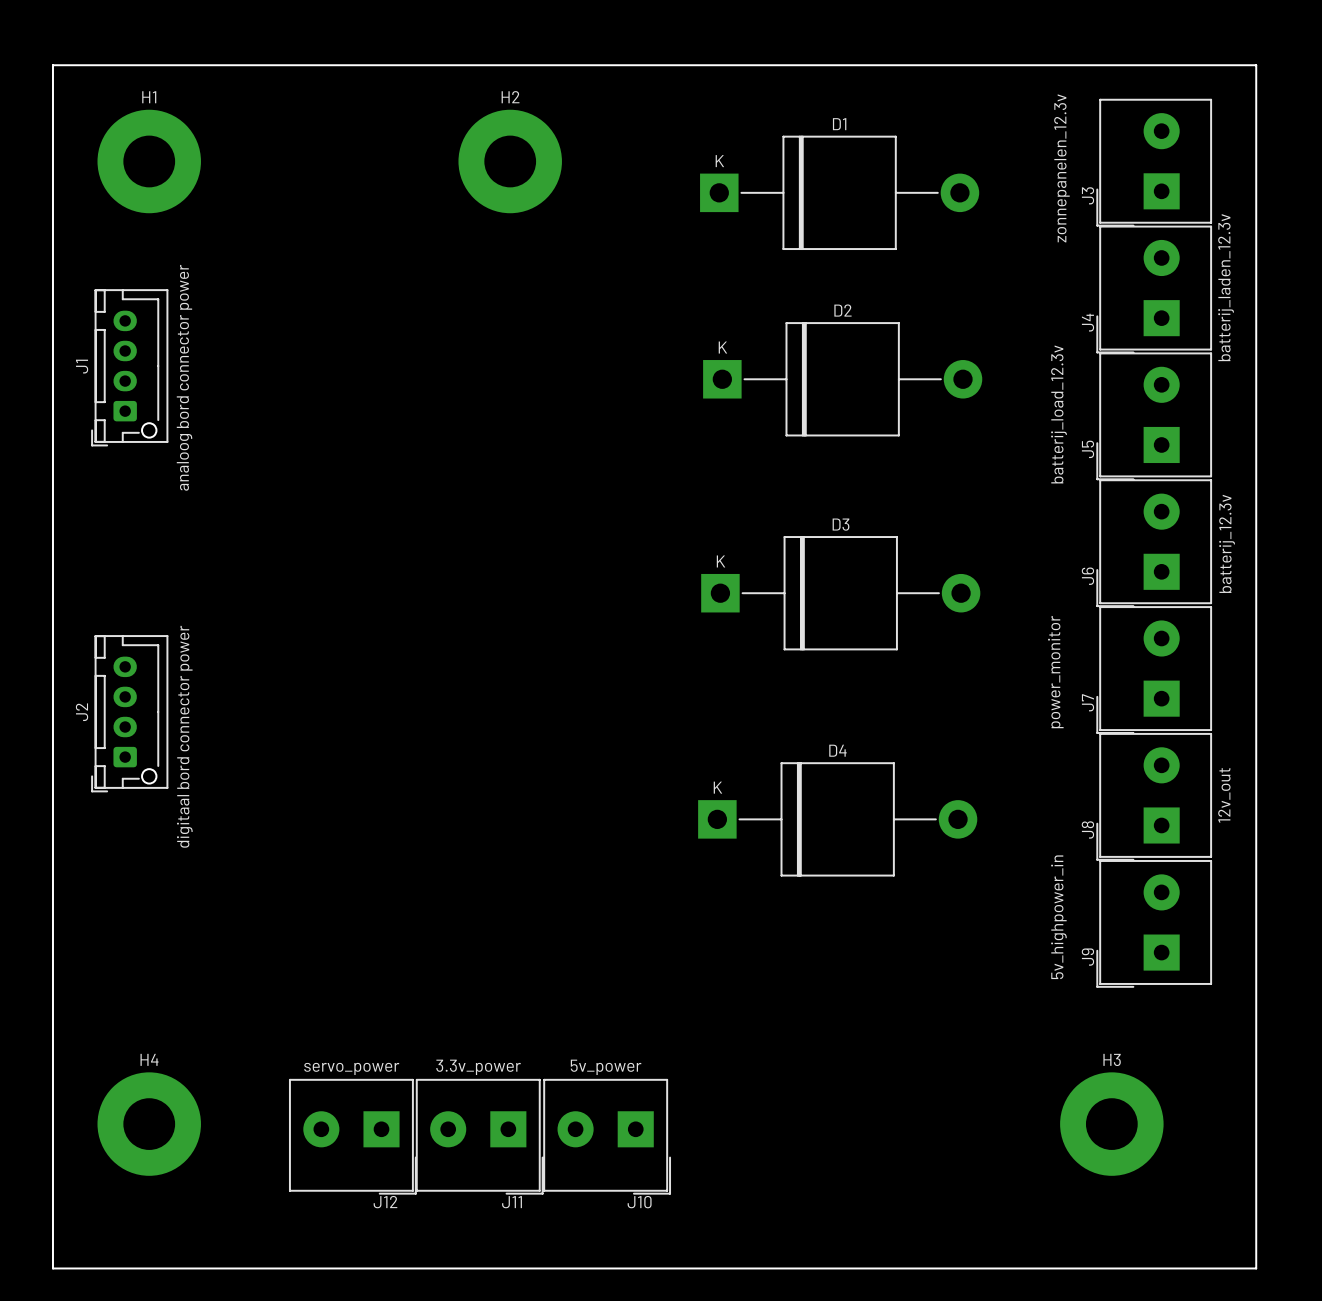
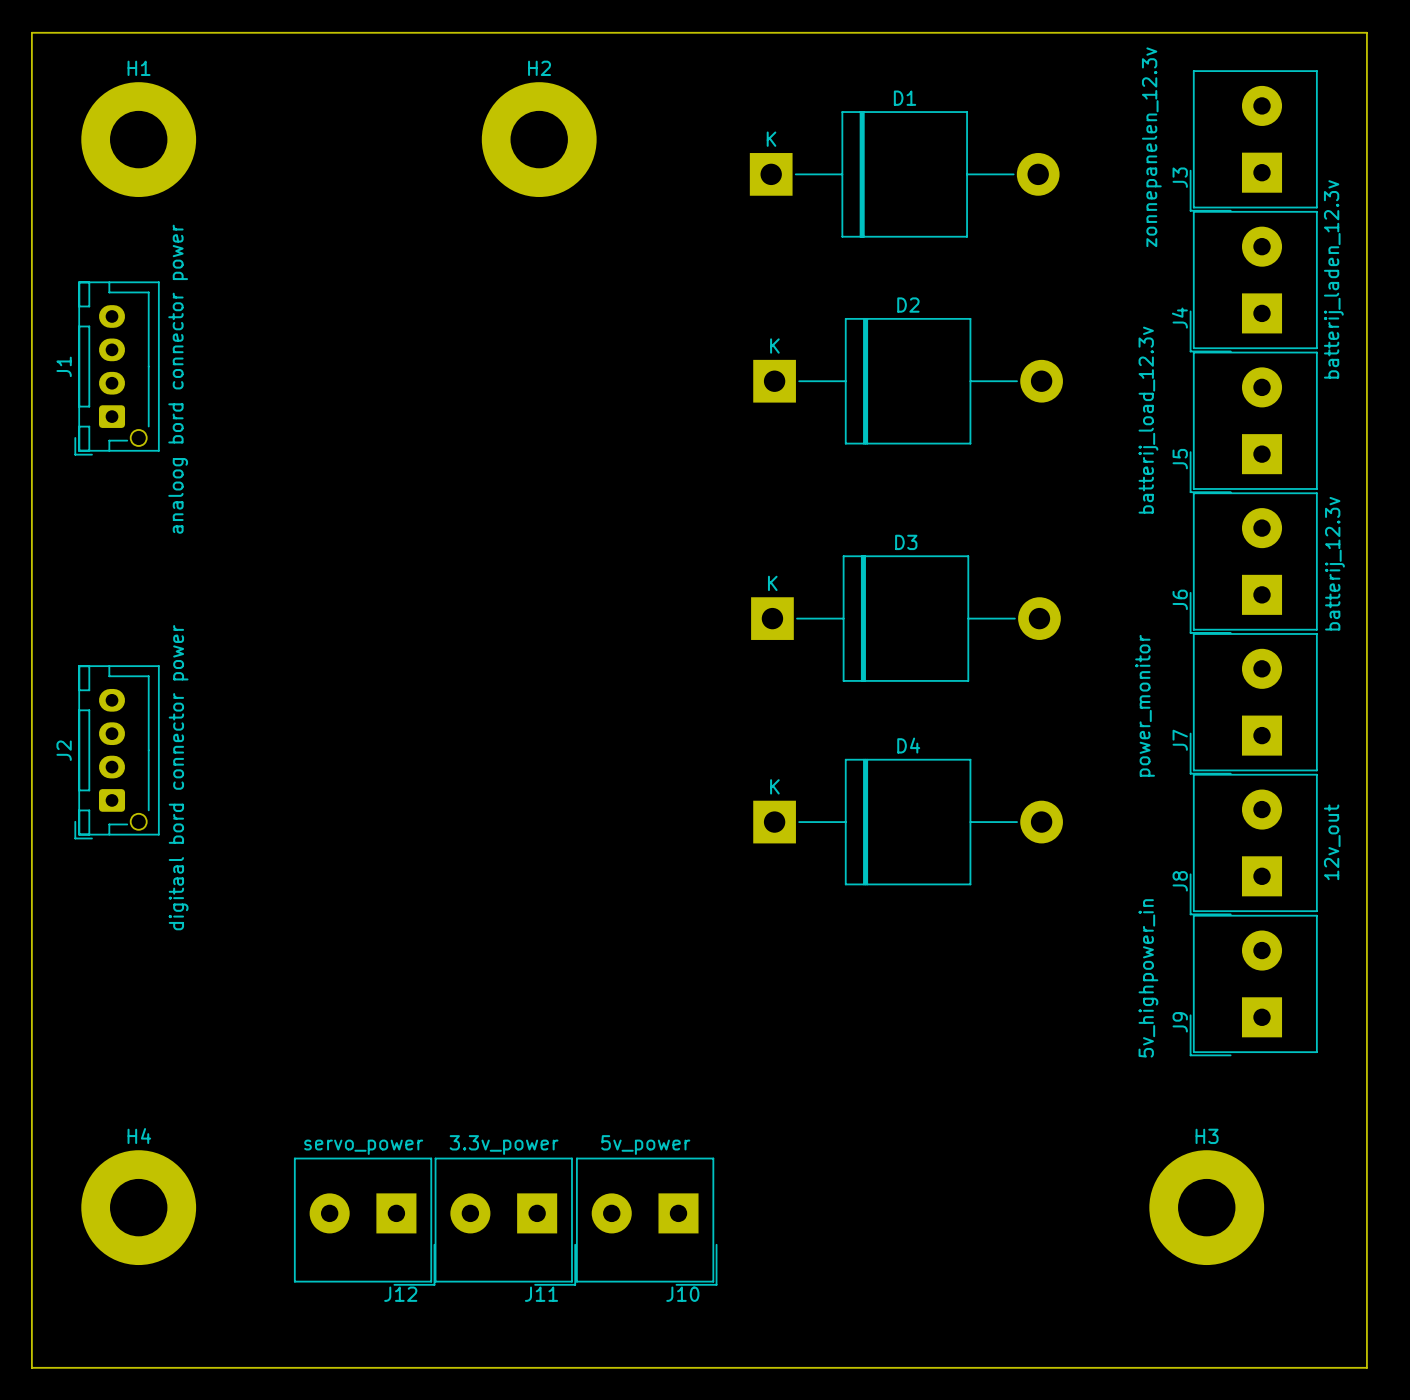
D4 position: (837, 819) -> (908, 822)

